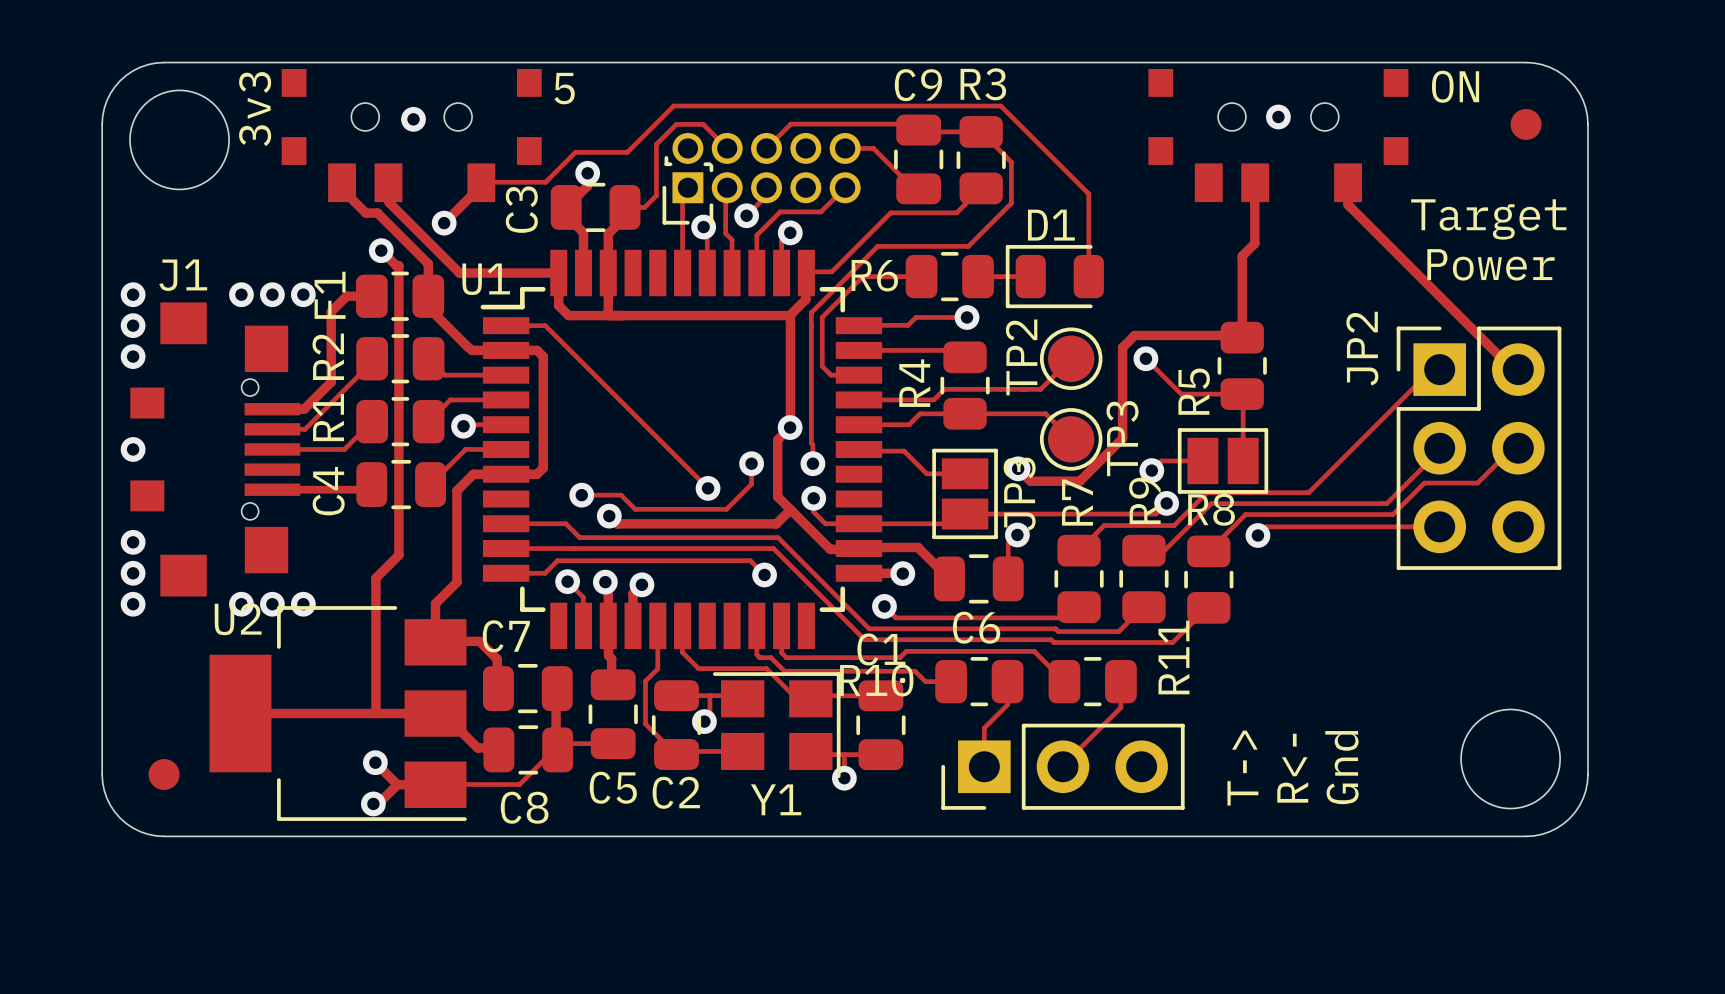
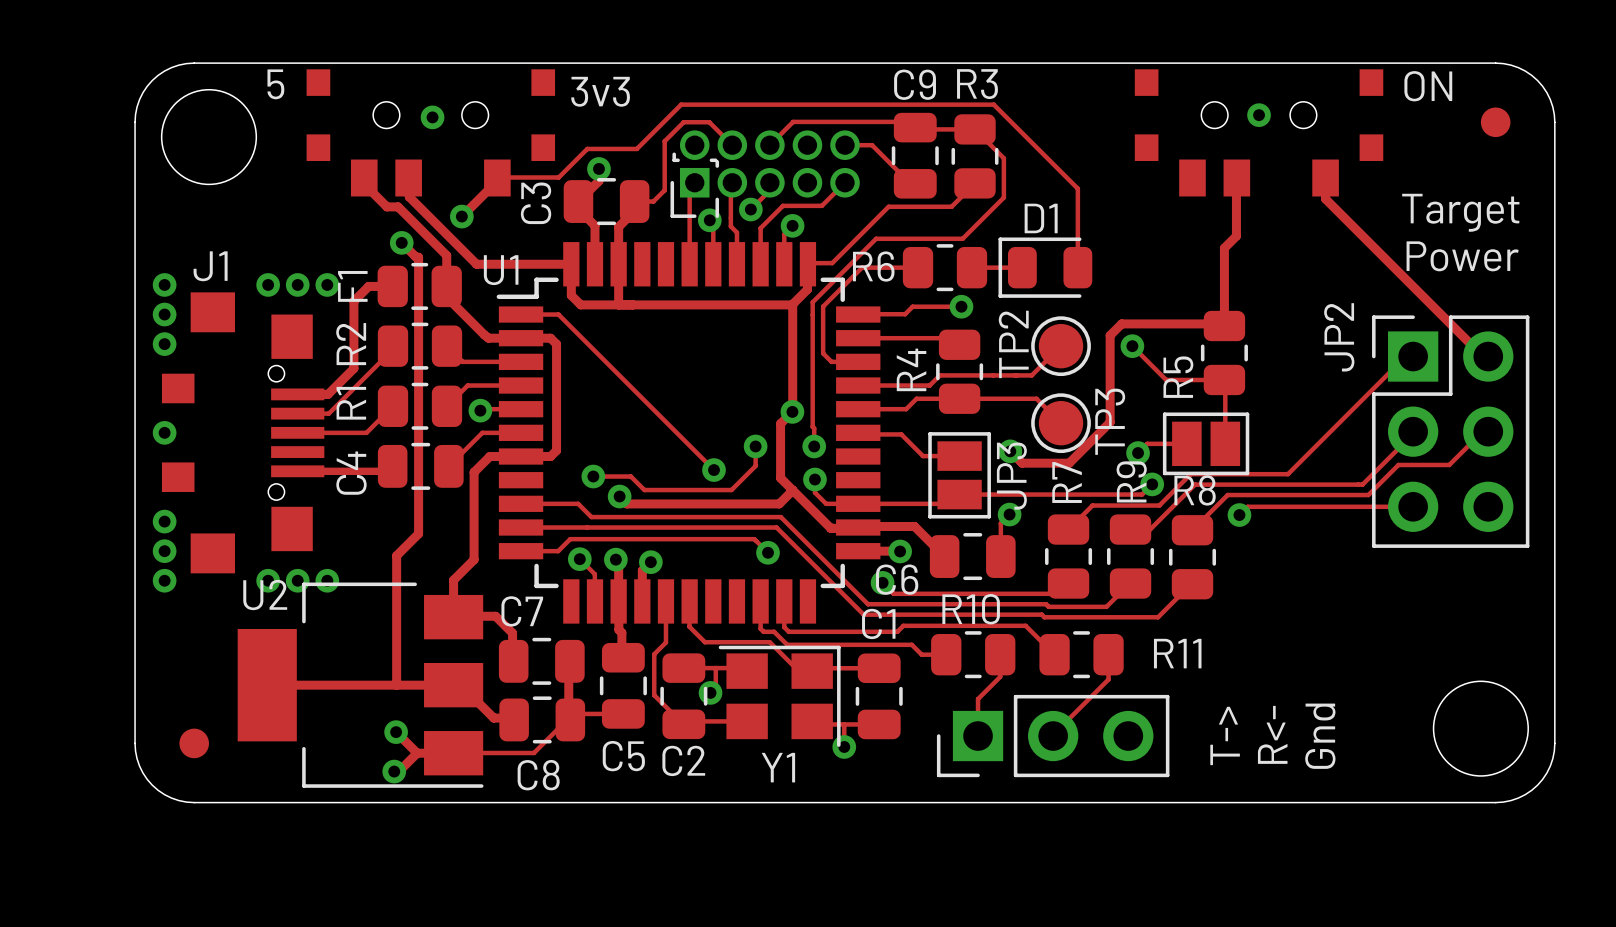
text: 5 (564, 88) -> 3v3 (600, 91)
text: 3v3 (255, 109) -> 5 (275, 84)
C6 name position: C6 (976, 627) -> C6 (897, 579)
R11 name rotation: 0° (1173, 657) -> 90° clockwise (1177, 653)
R10 name position: R10 (876, 680) -> R10 (971, 609)

